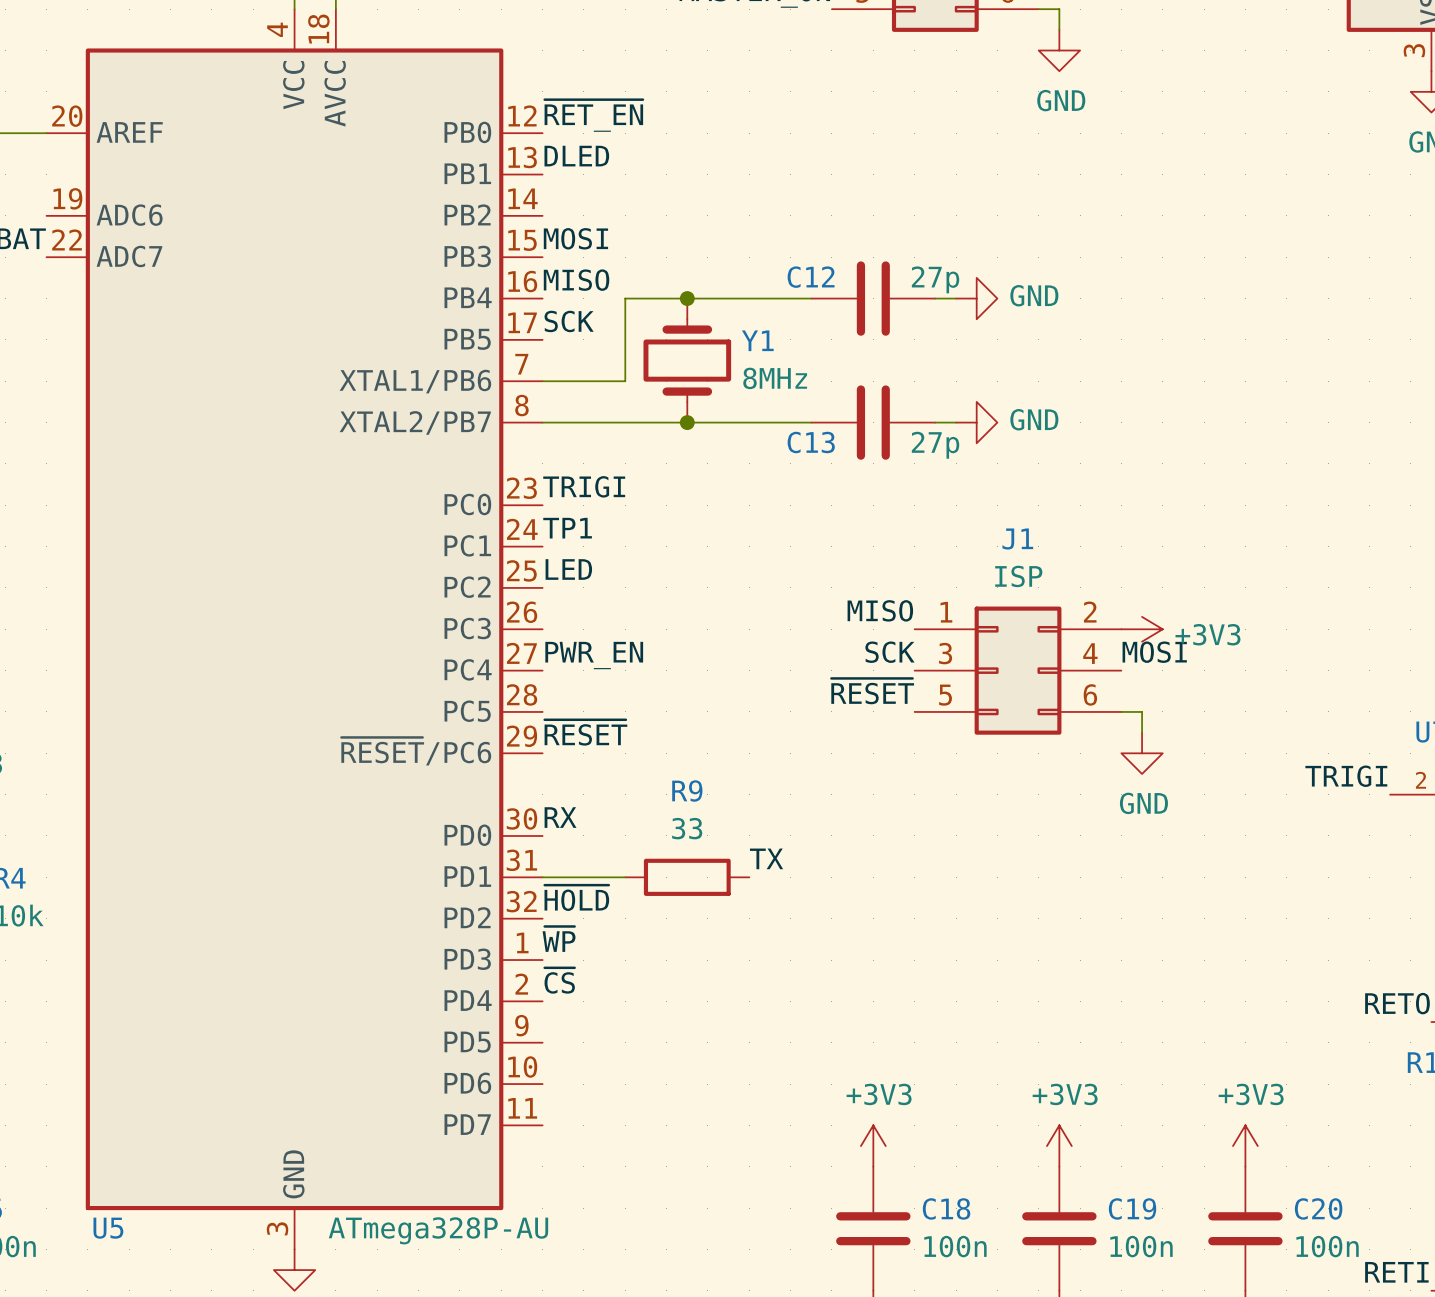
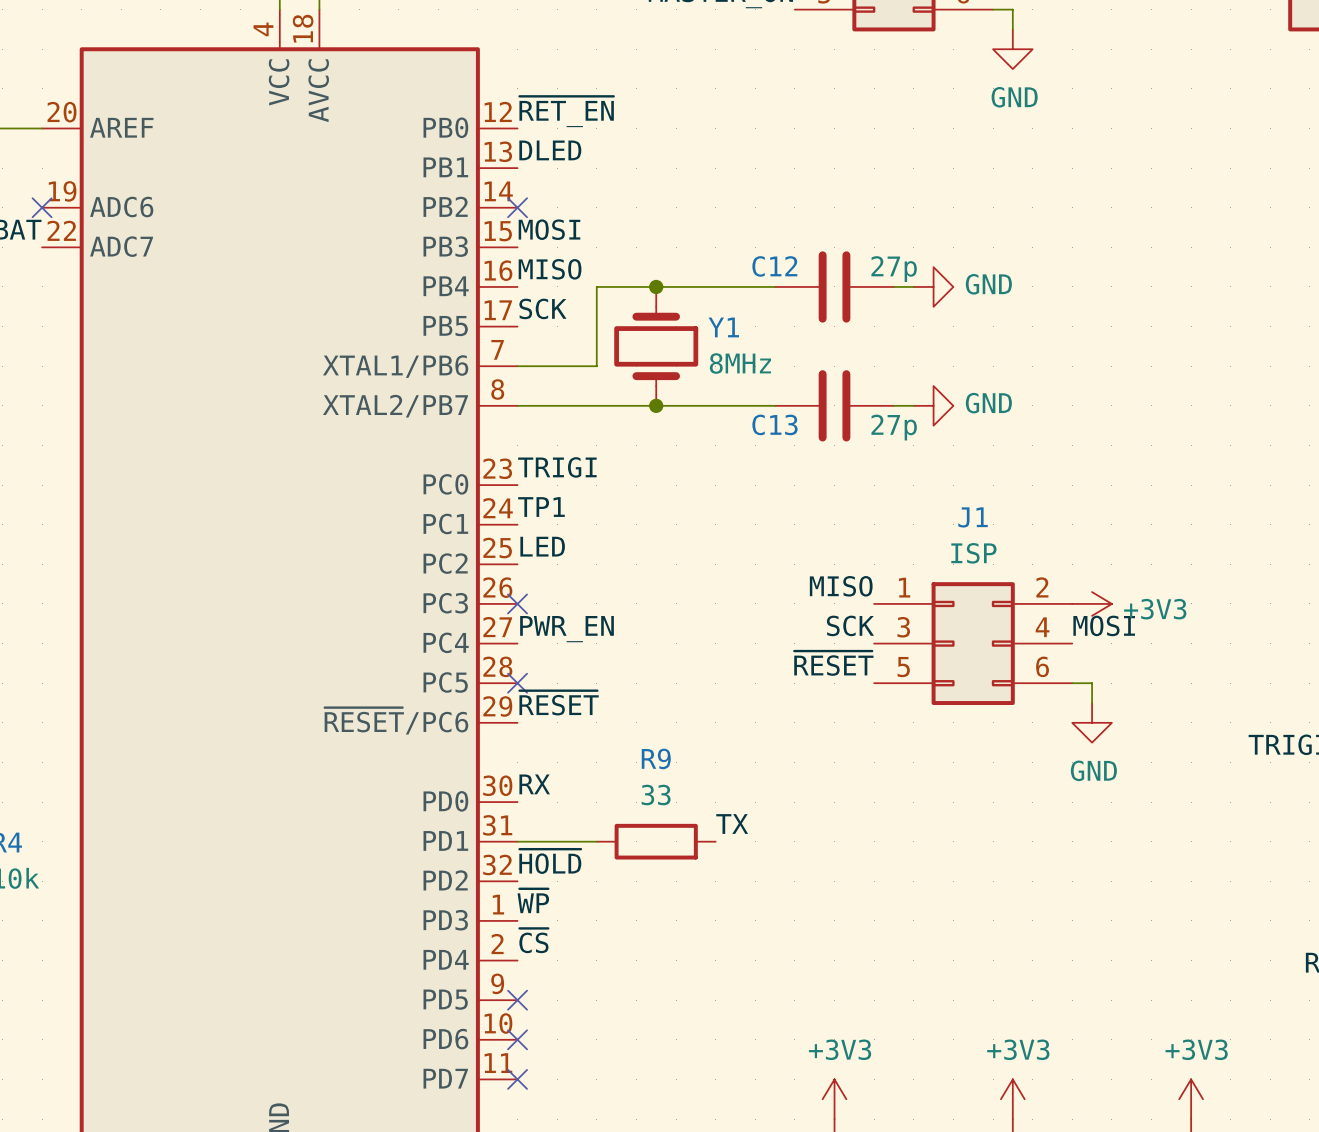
no-connect mark: none -> (42, 207)
no-connect mark: none -> (517, 207)
no-connect mark: none -> (517, 603)
no-connect mark: none -> (517, 683)
no-connect mark: none -> (517, 1000)
no-connect mark: none -> (517, 1039)
no-connect mark: none -> (517, 1079)

